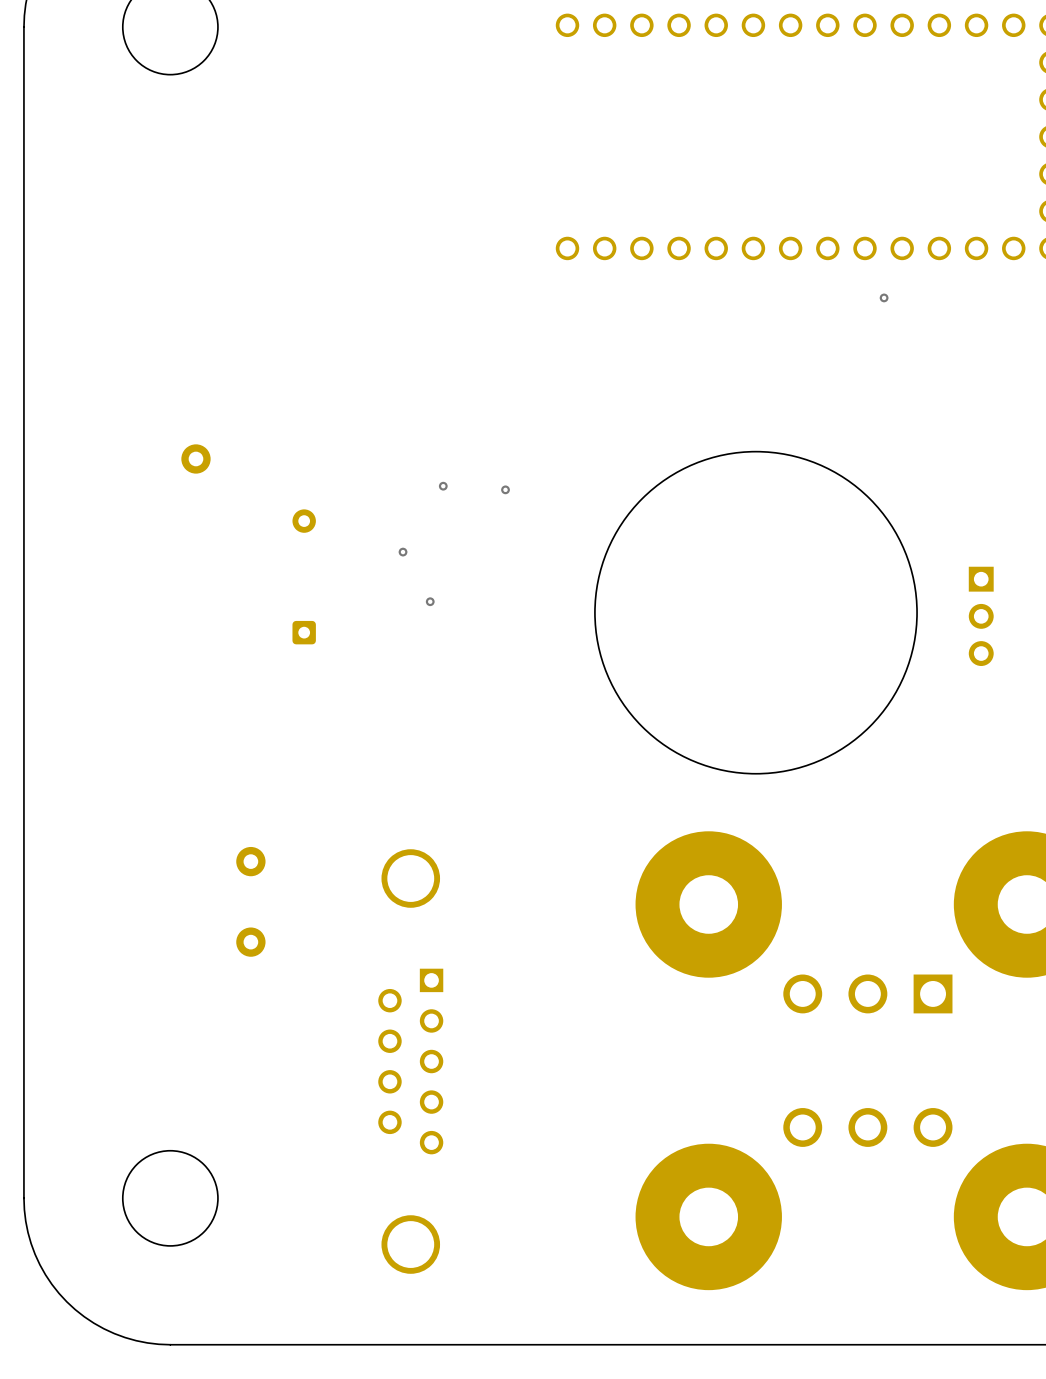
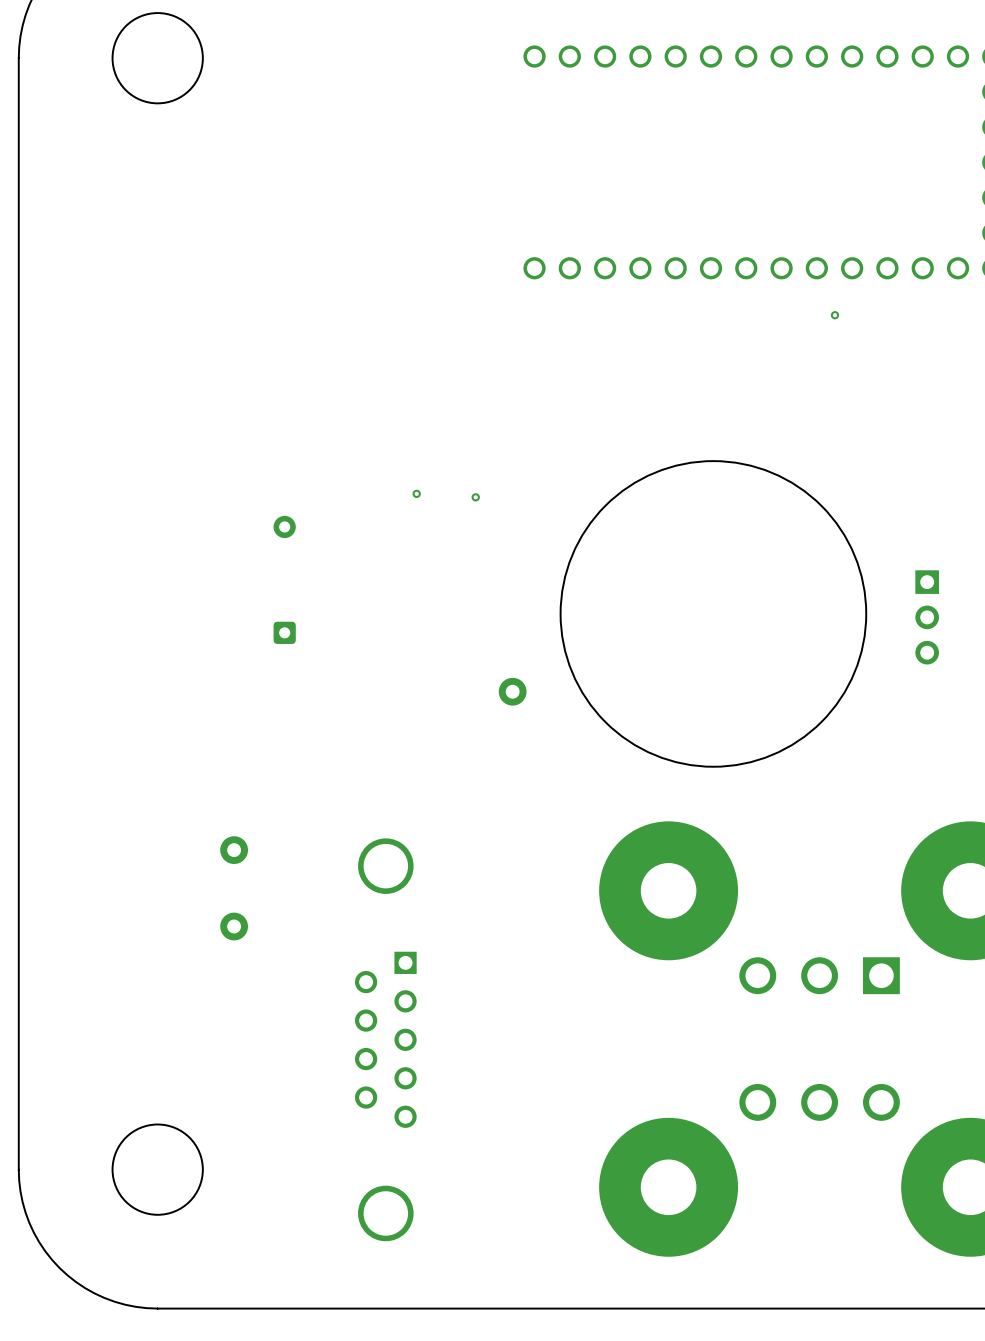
part: (195, 458) -> none
via: (403, 552) -> none
via: (430, 601) -> none
part: none -> (512, 691)

